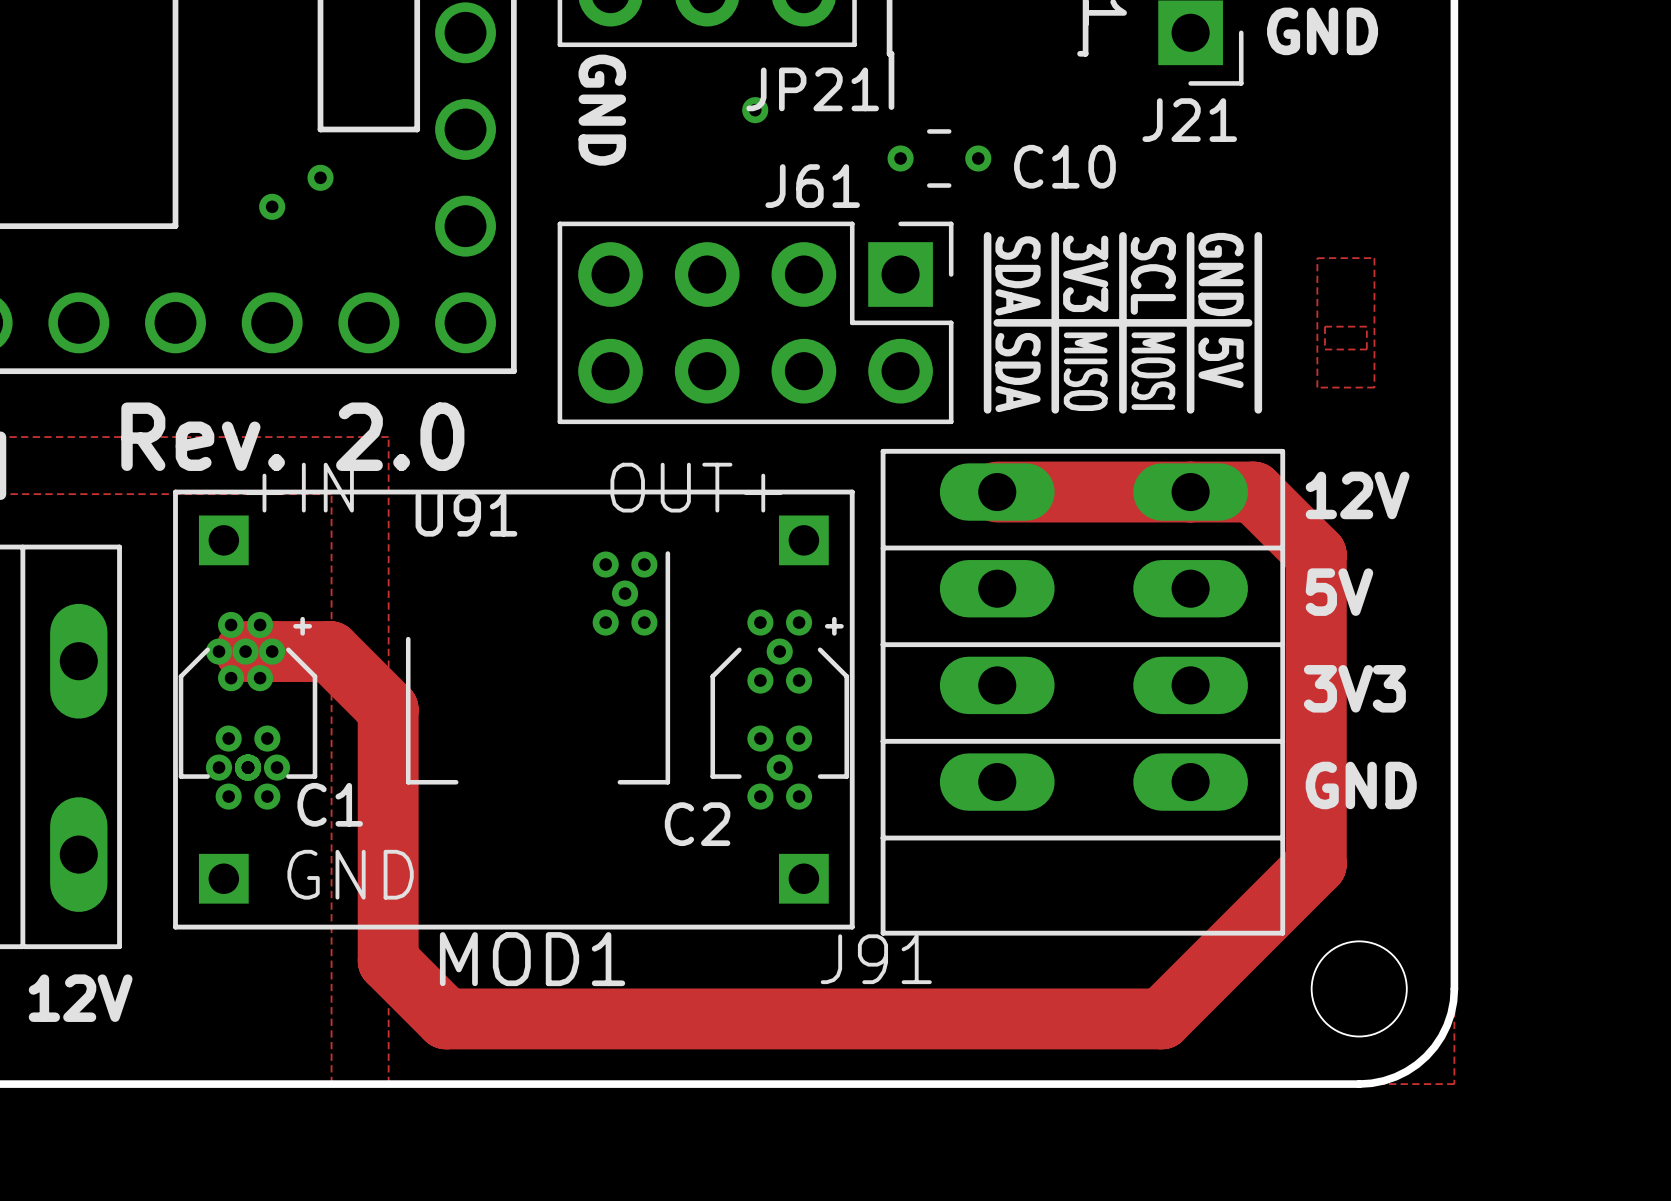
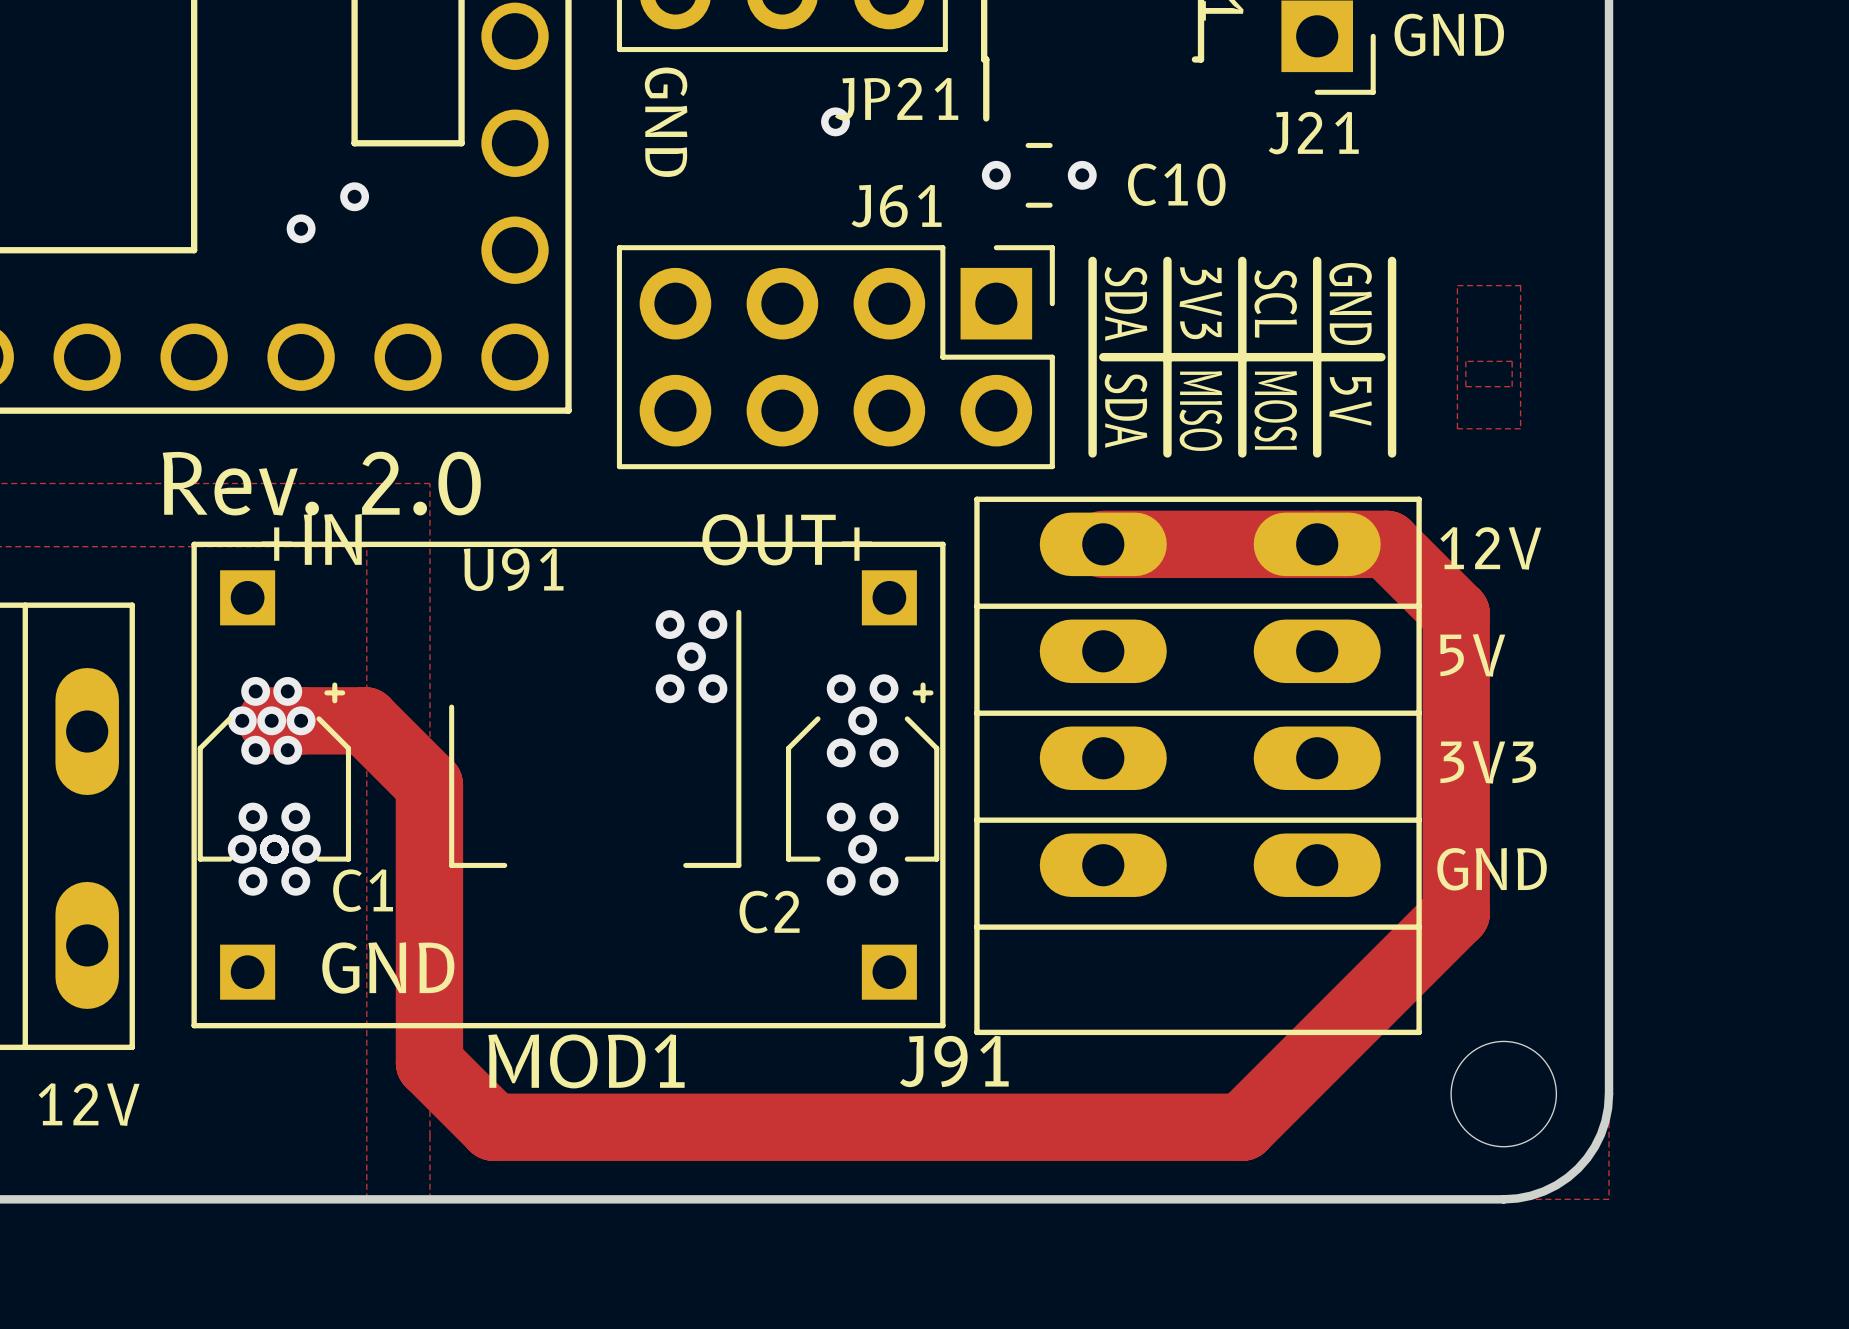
track: (1316, 825) (1316, 864) (1161, 1018) (1122, 1018) -> (1456, 913) (1242, 1127)

